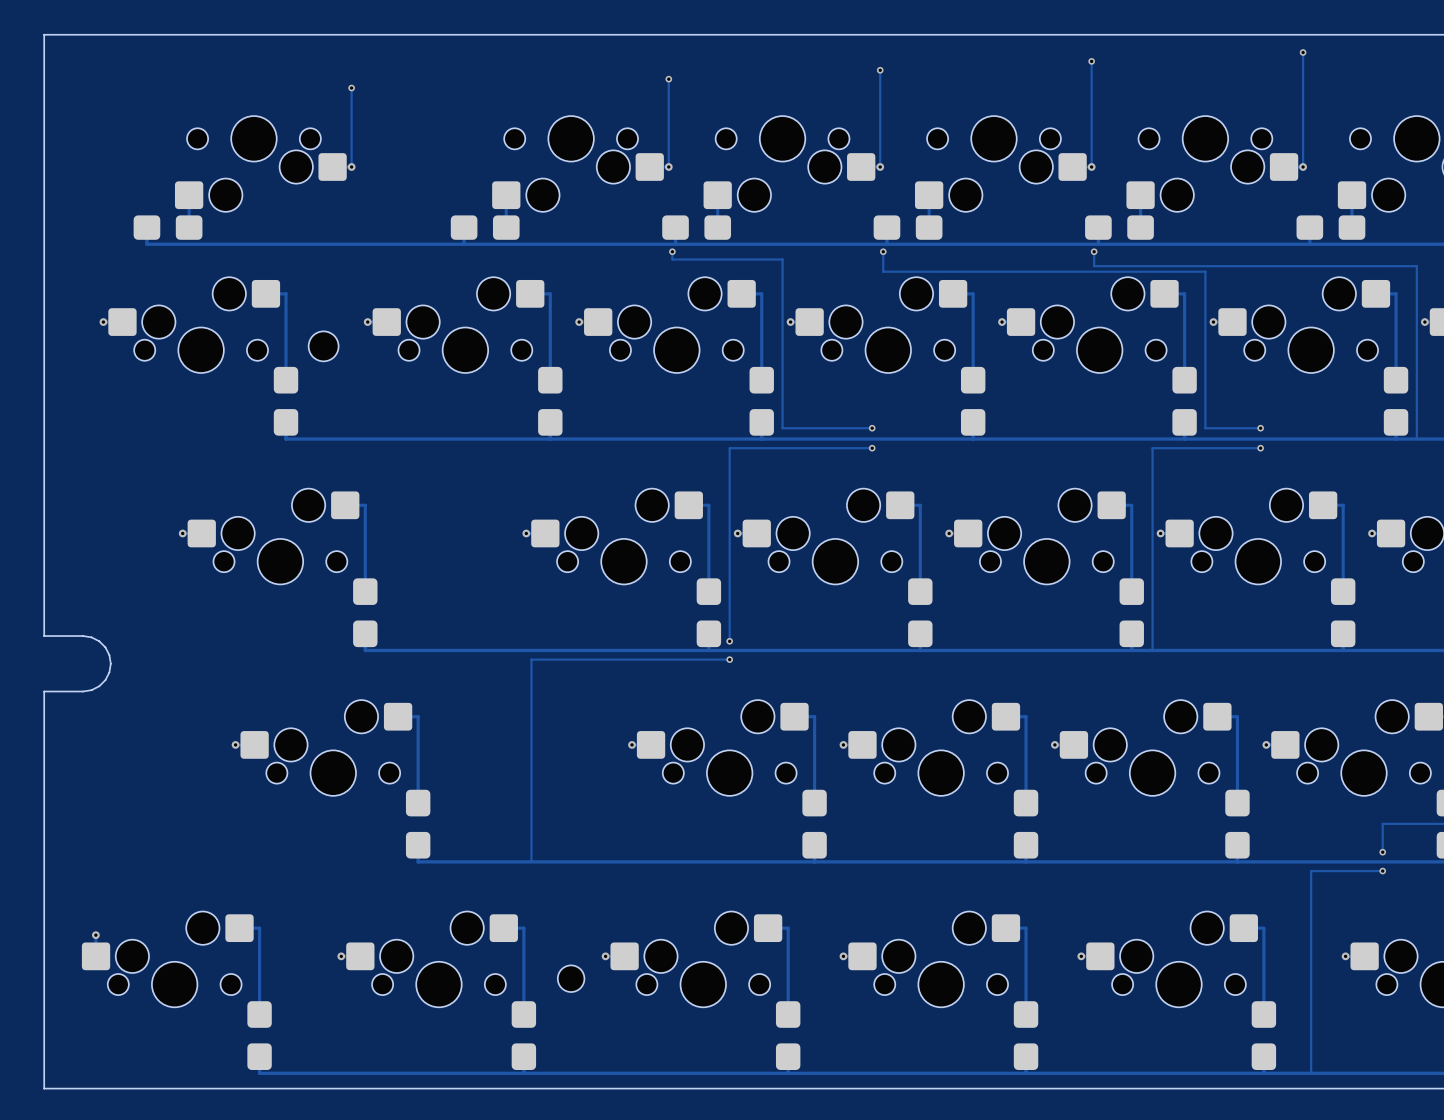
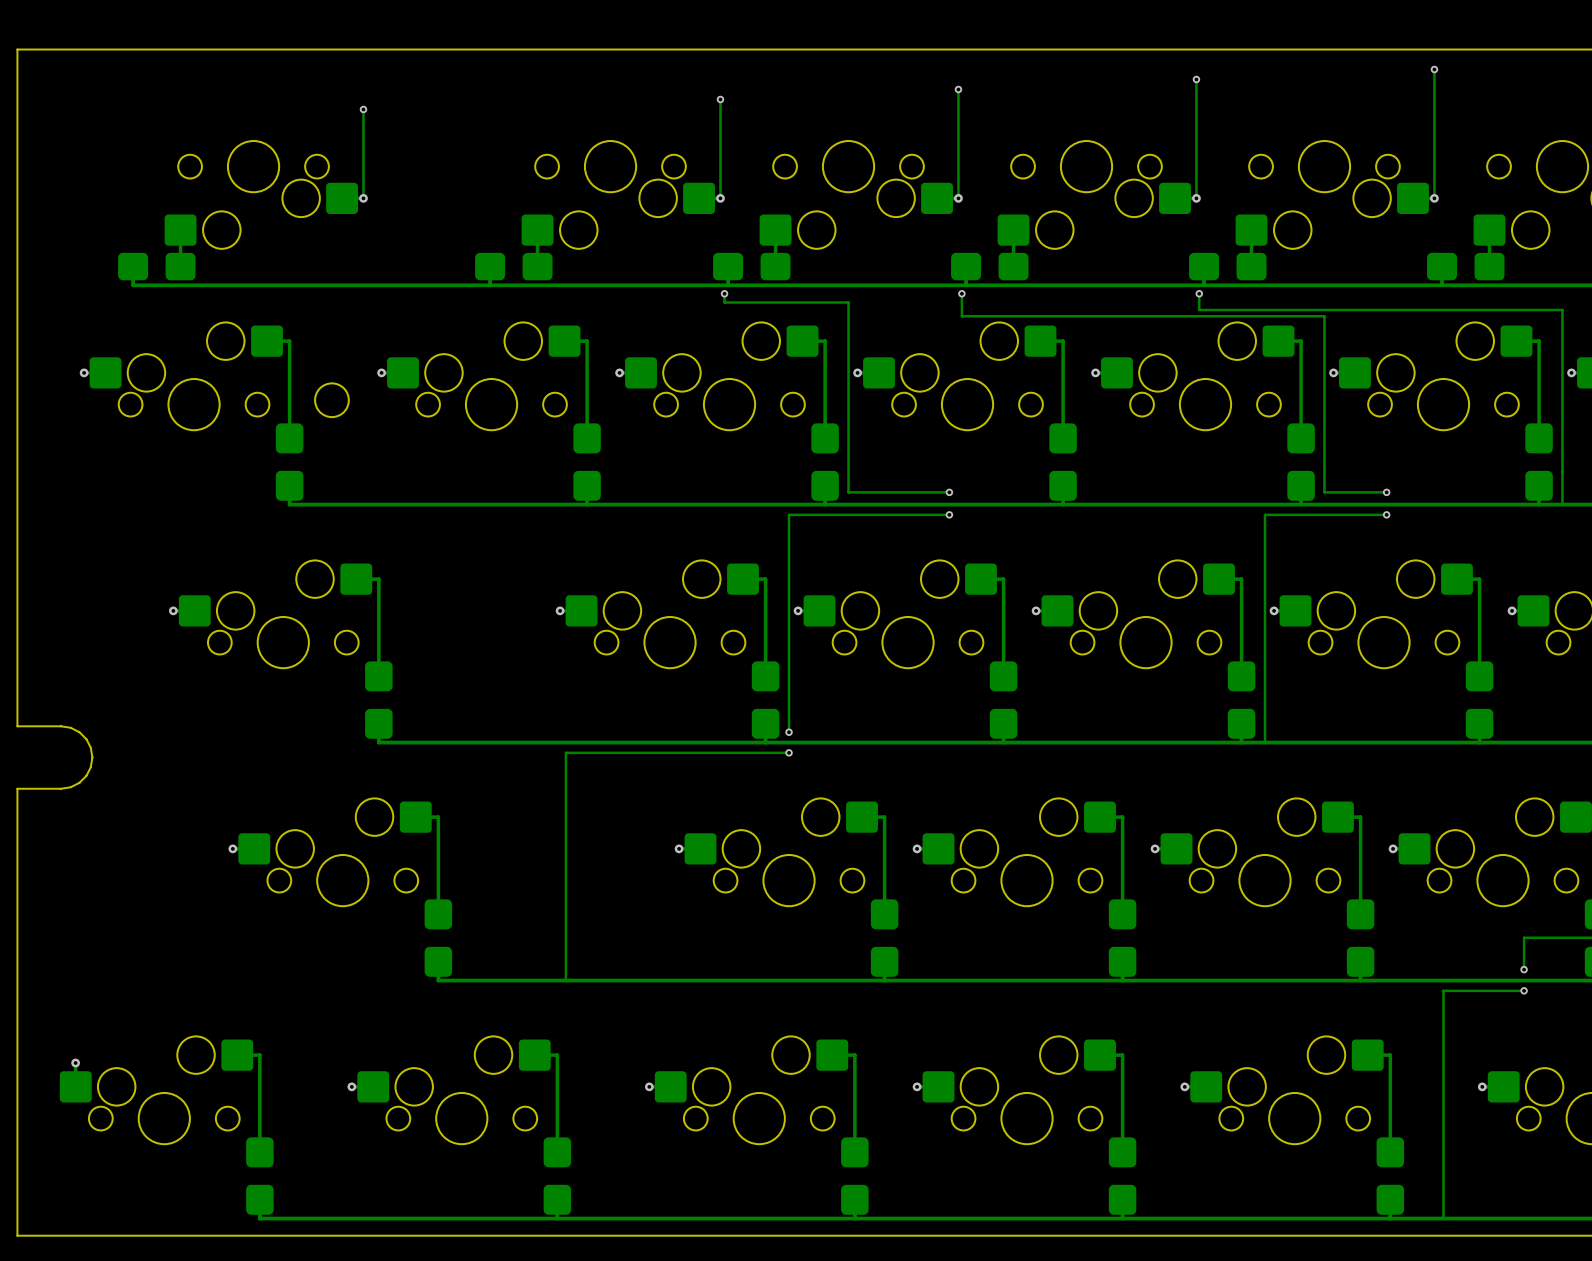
part: (571, 978) -> none

